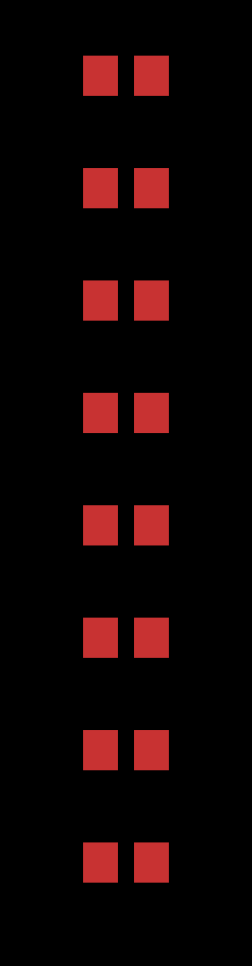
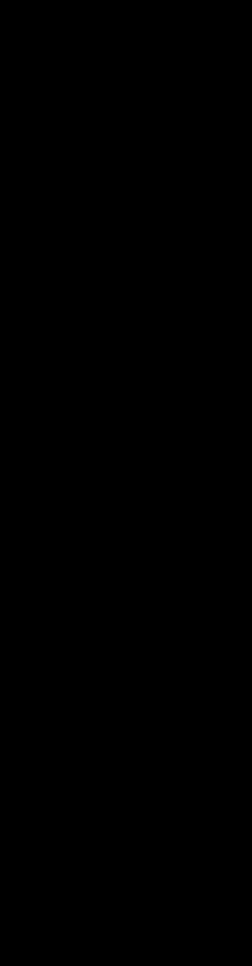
part: (125, 75) -> none
part: (125, 188) -> none
part: (125, 300) -> none
part: (125, 412) -> none
part: (125, 525) -> none
part: (125, 637) -> none
part: (125, 750) -> none
part: (125, 862) -> none

